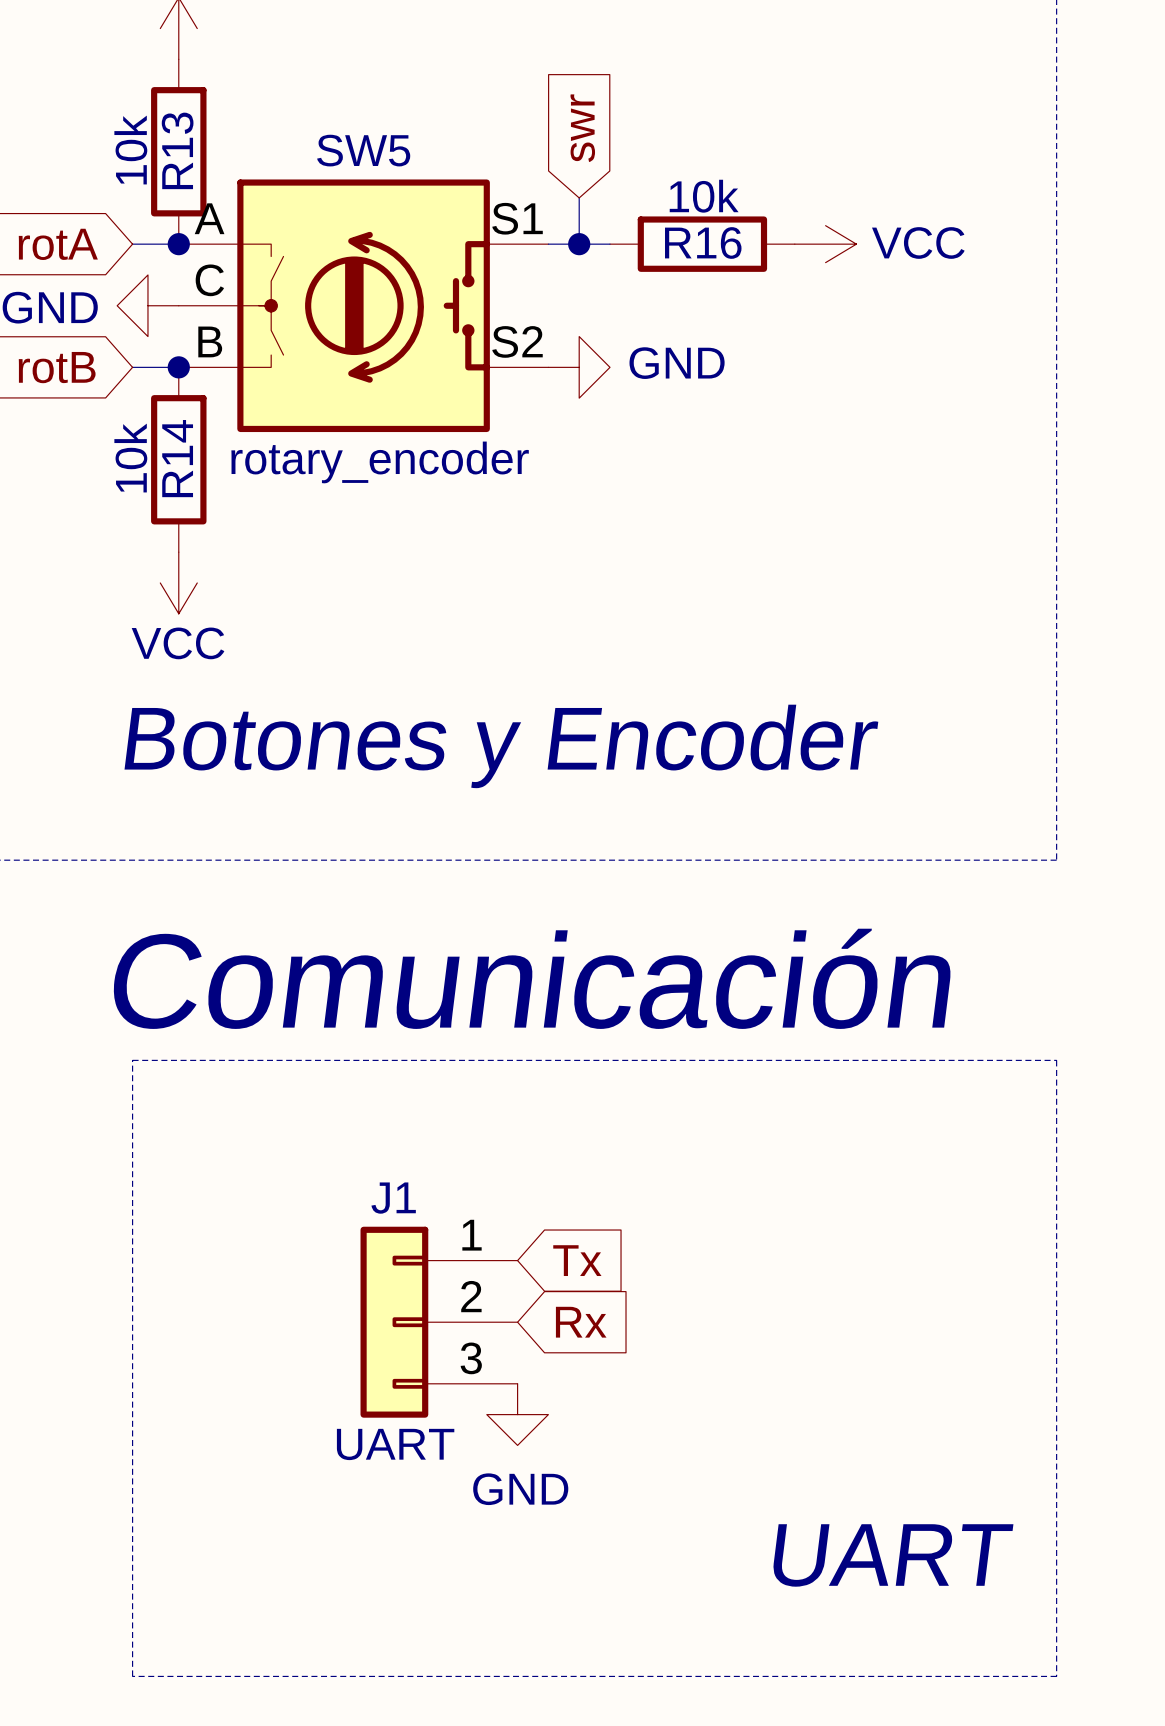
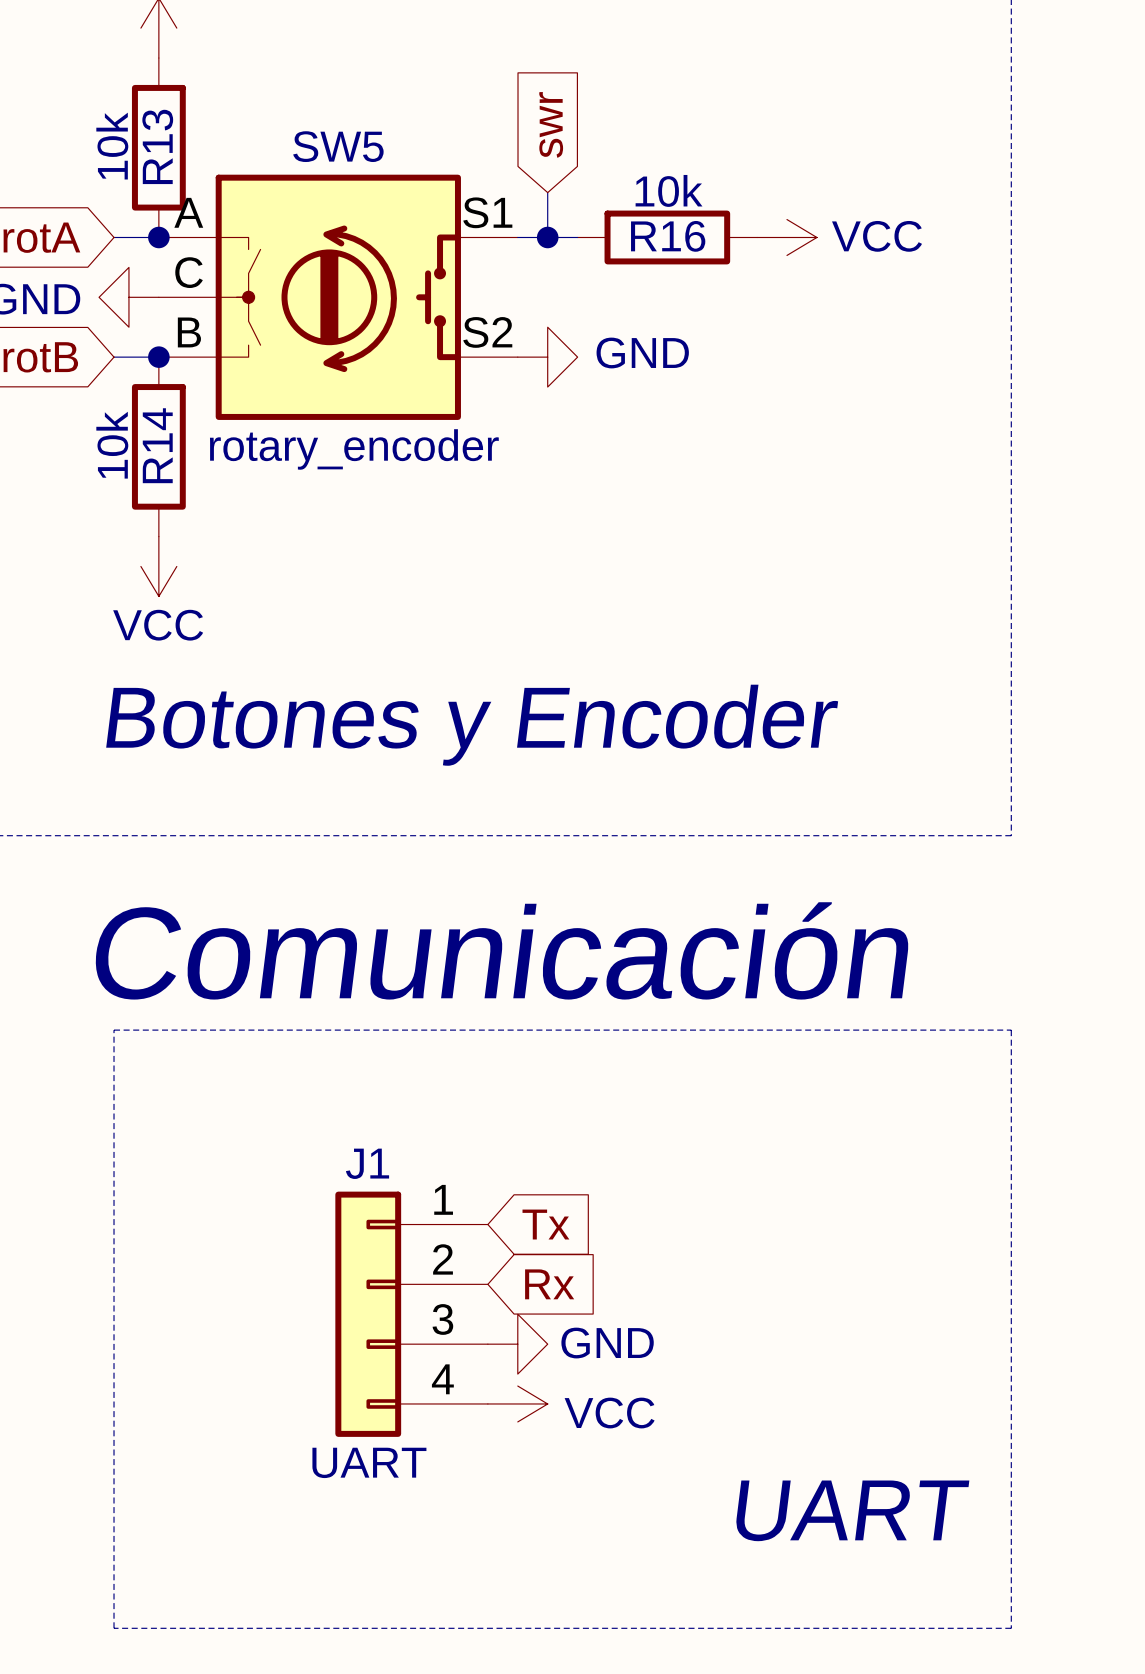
J1 symbol: [360, 1226, 518, 1418] -> [335, 1191, 488, 1437]
power symbol rotation: 0° (517, 1414) -> 90° counterclockwise (517, 1344)
power symbol position: GND (517, 1414) -> GND (517, 1344)
power symbol: none -> VCC (517, 1403)

